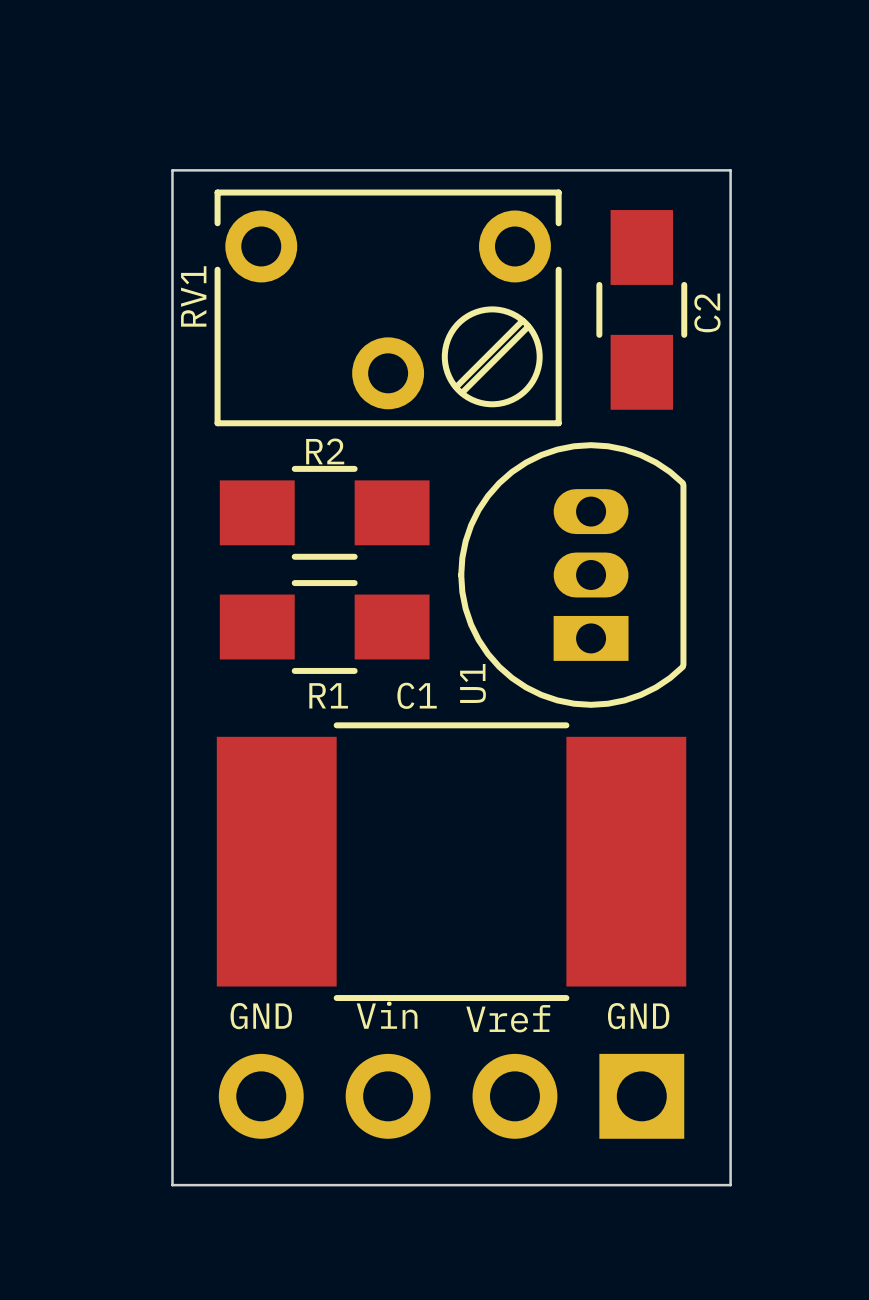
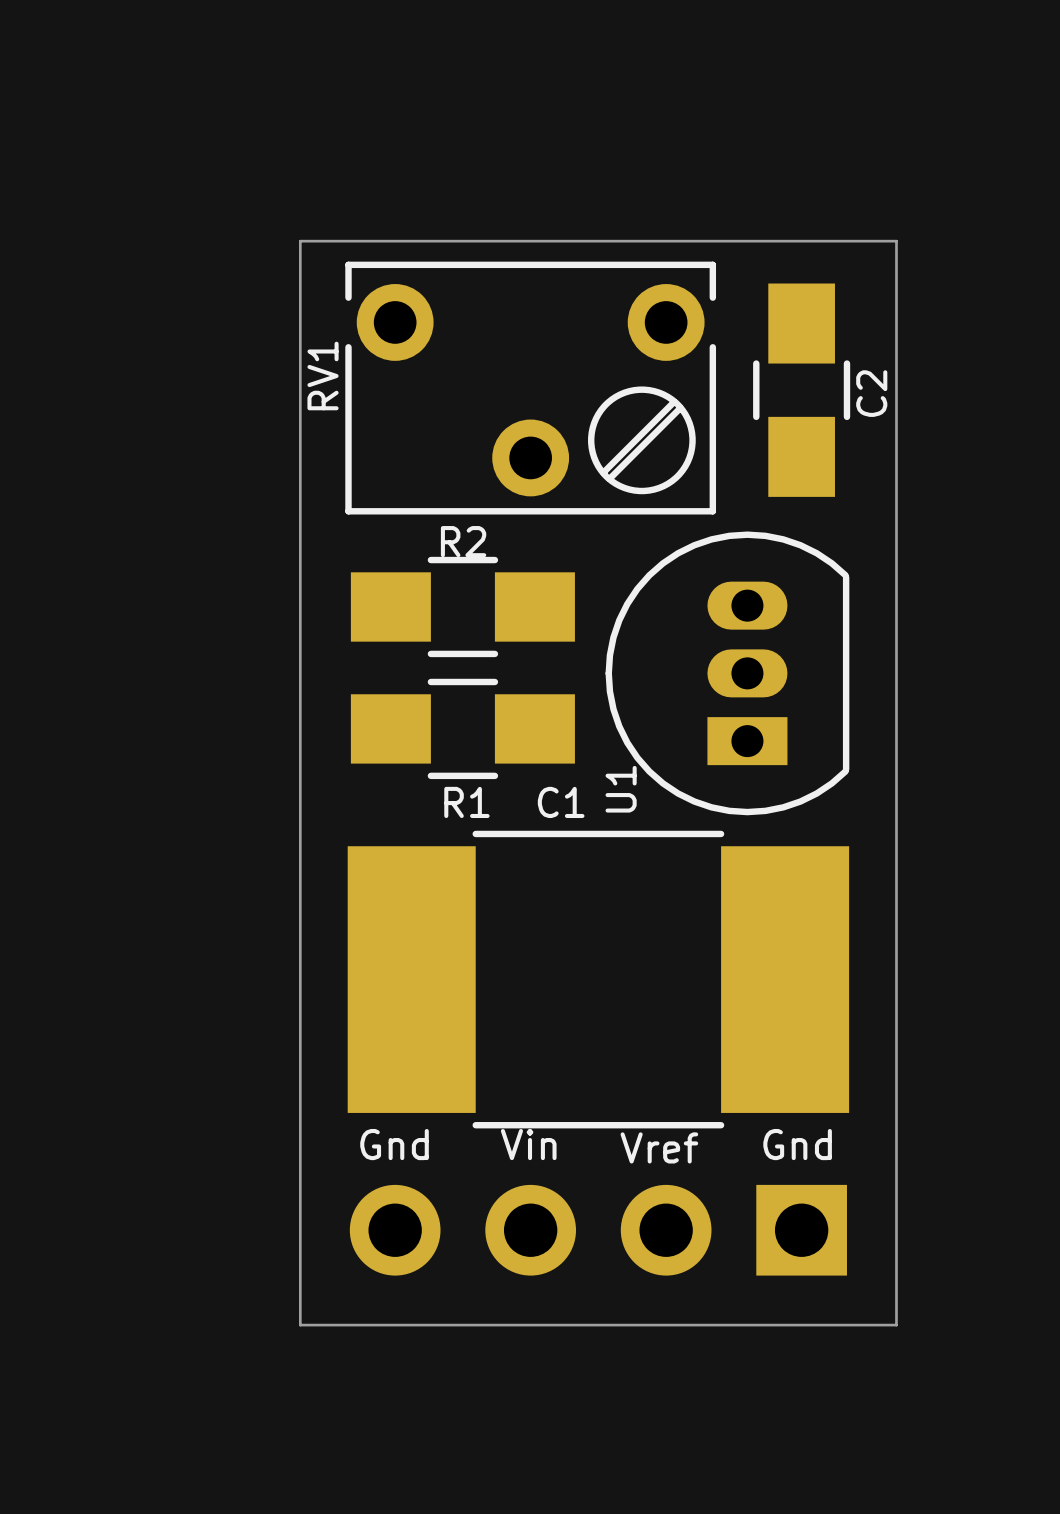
text: GND (261, 1016) -> Gnd (394, 1144)
text: GND (638, 1016) -> Gnd (797, 1144)

